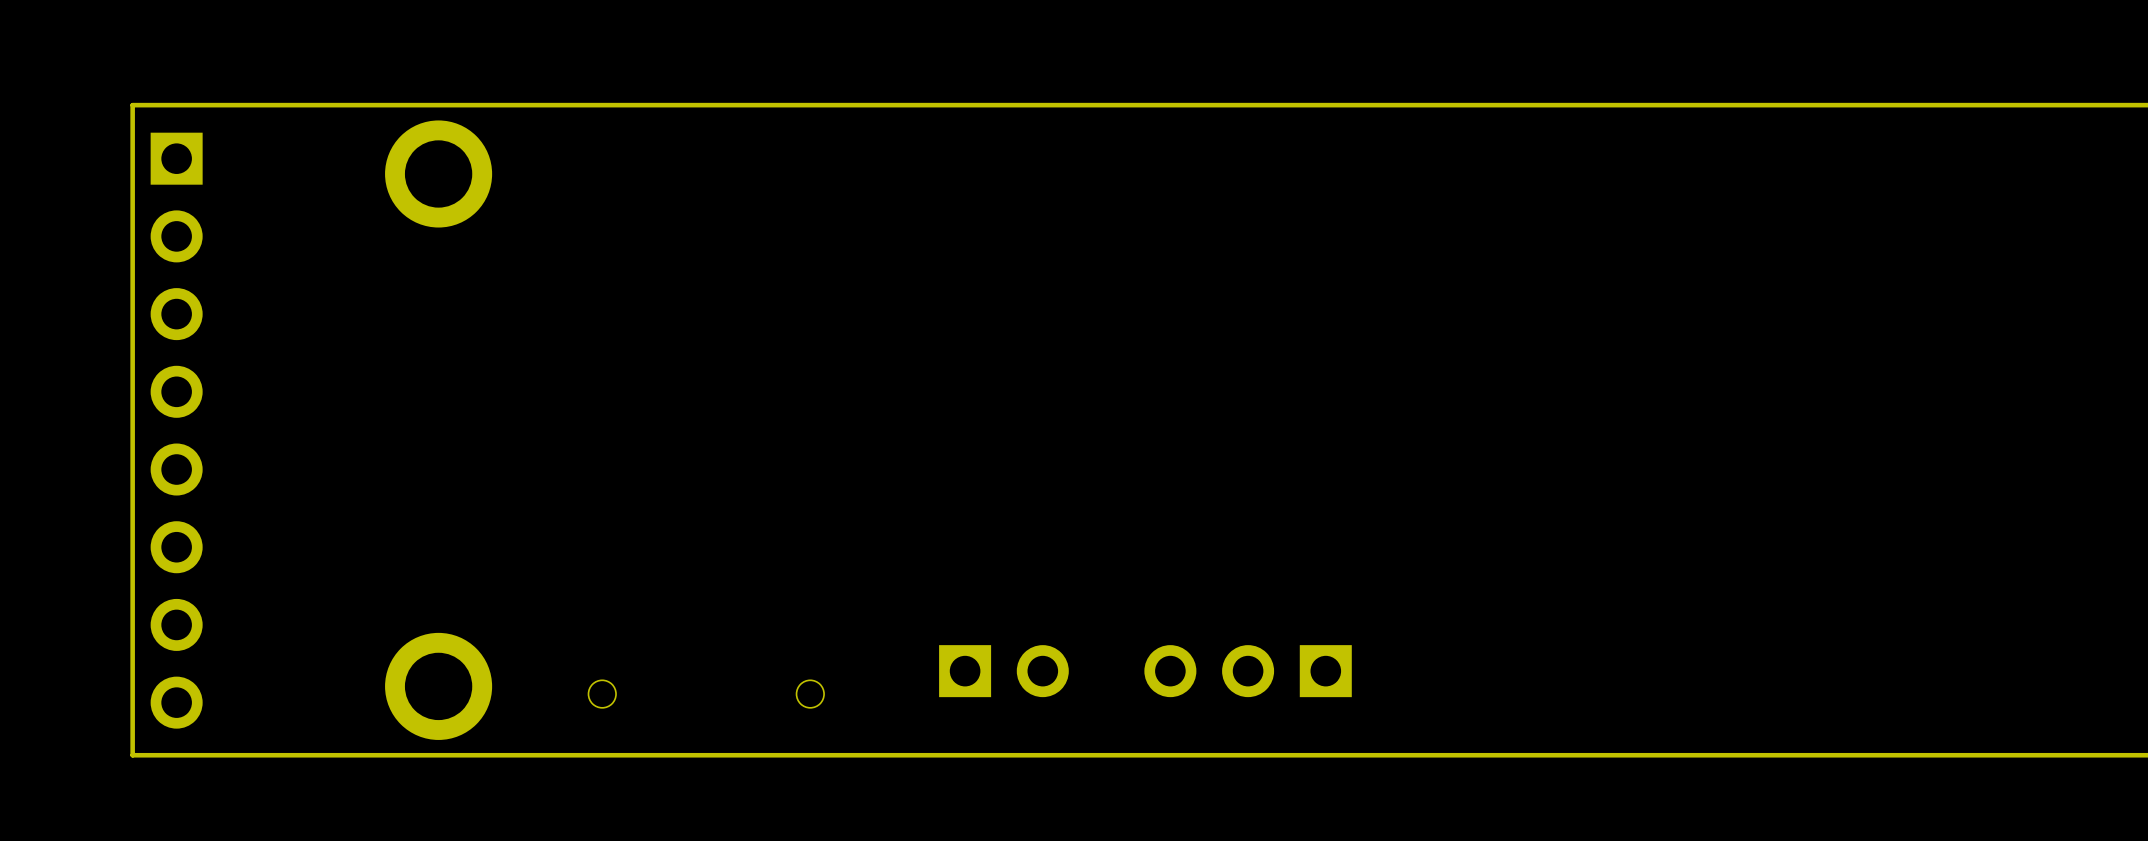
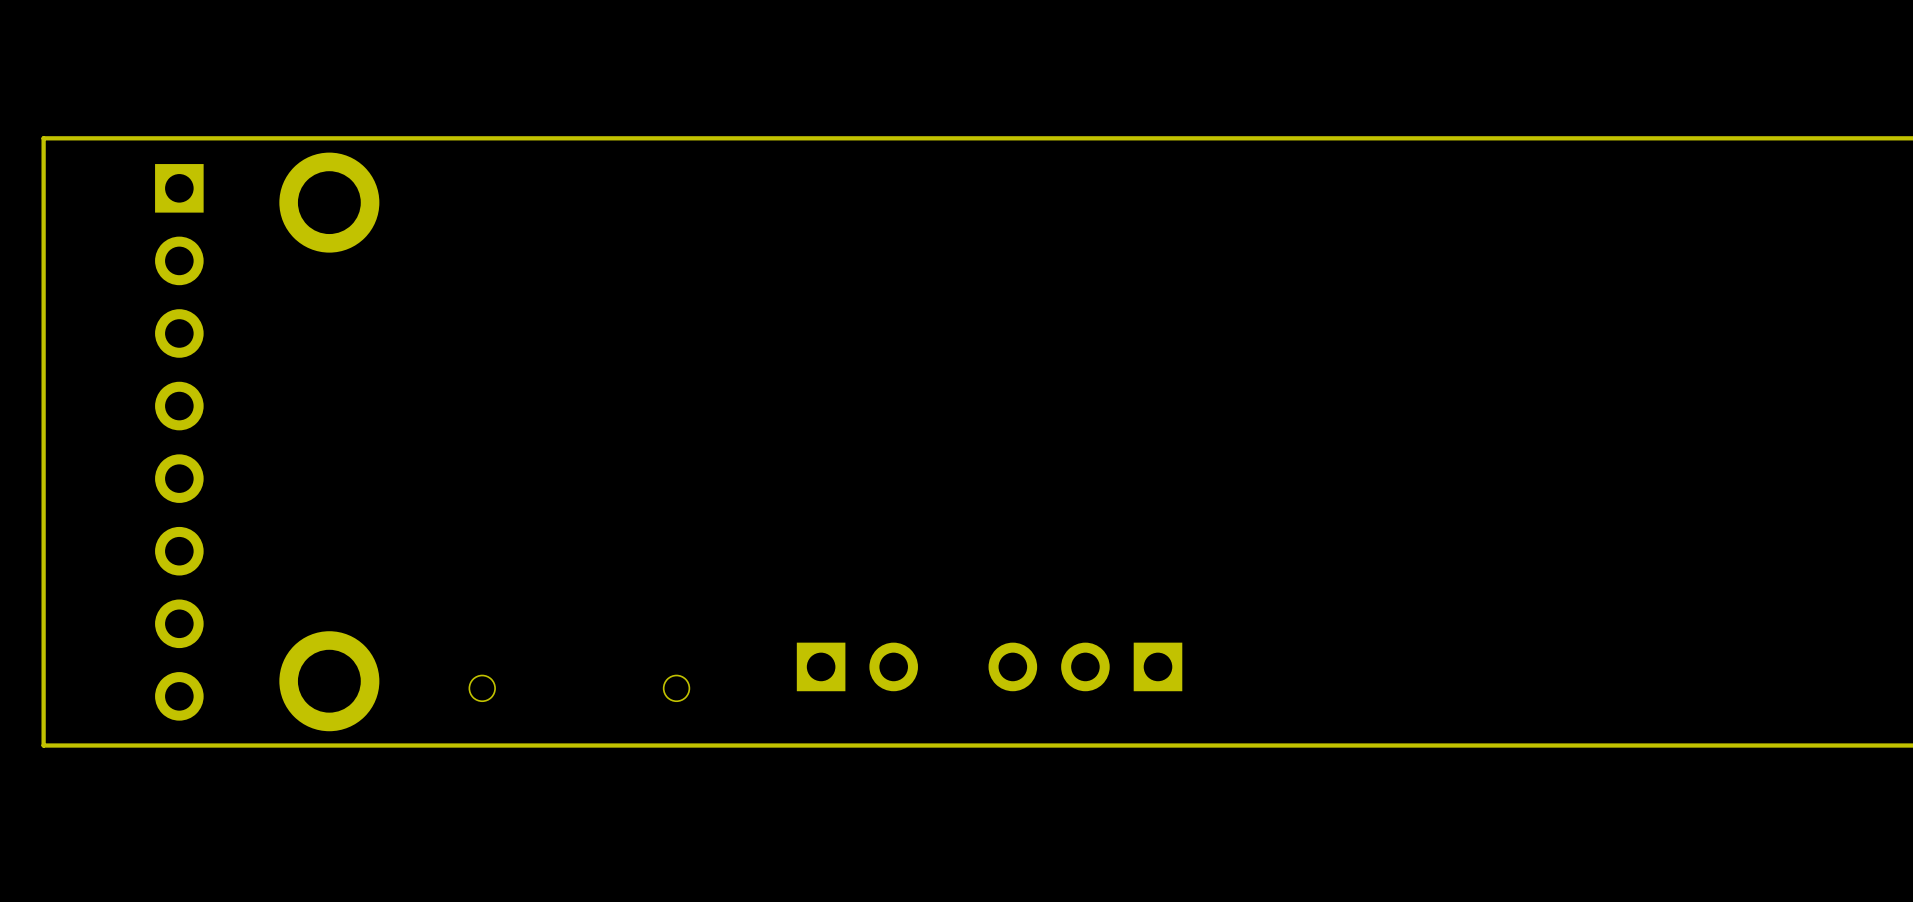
part position: (176, 430) -> (179, 442)

